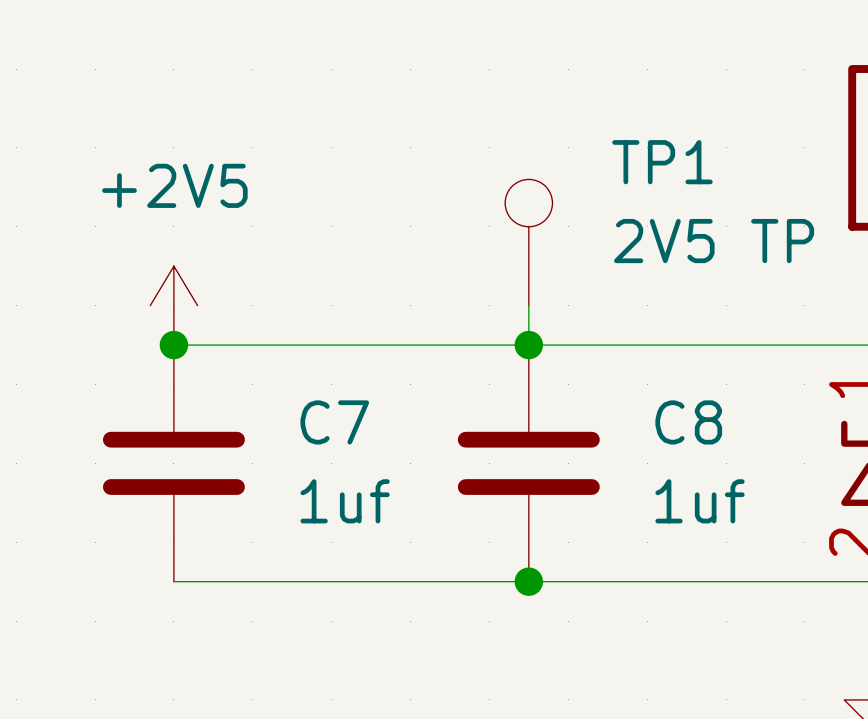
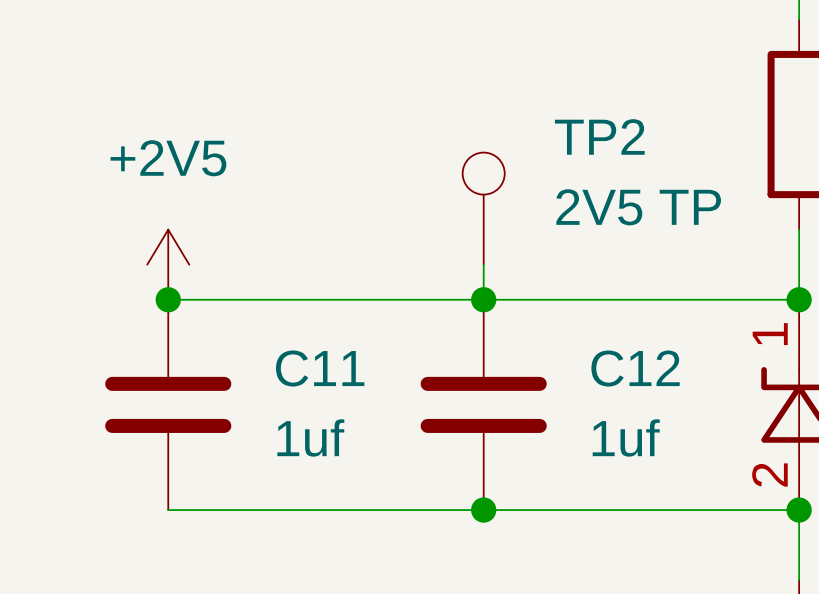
TP1 name: TP1 (662, 162) -> TP2 (599, 136)
C7 name: C7 (334, 422) -> C11 (320, 368)
C8 name: C8 (688, 422) -> C12 (635, 368)

